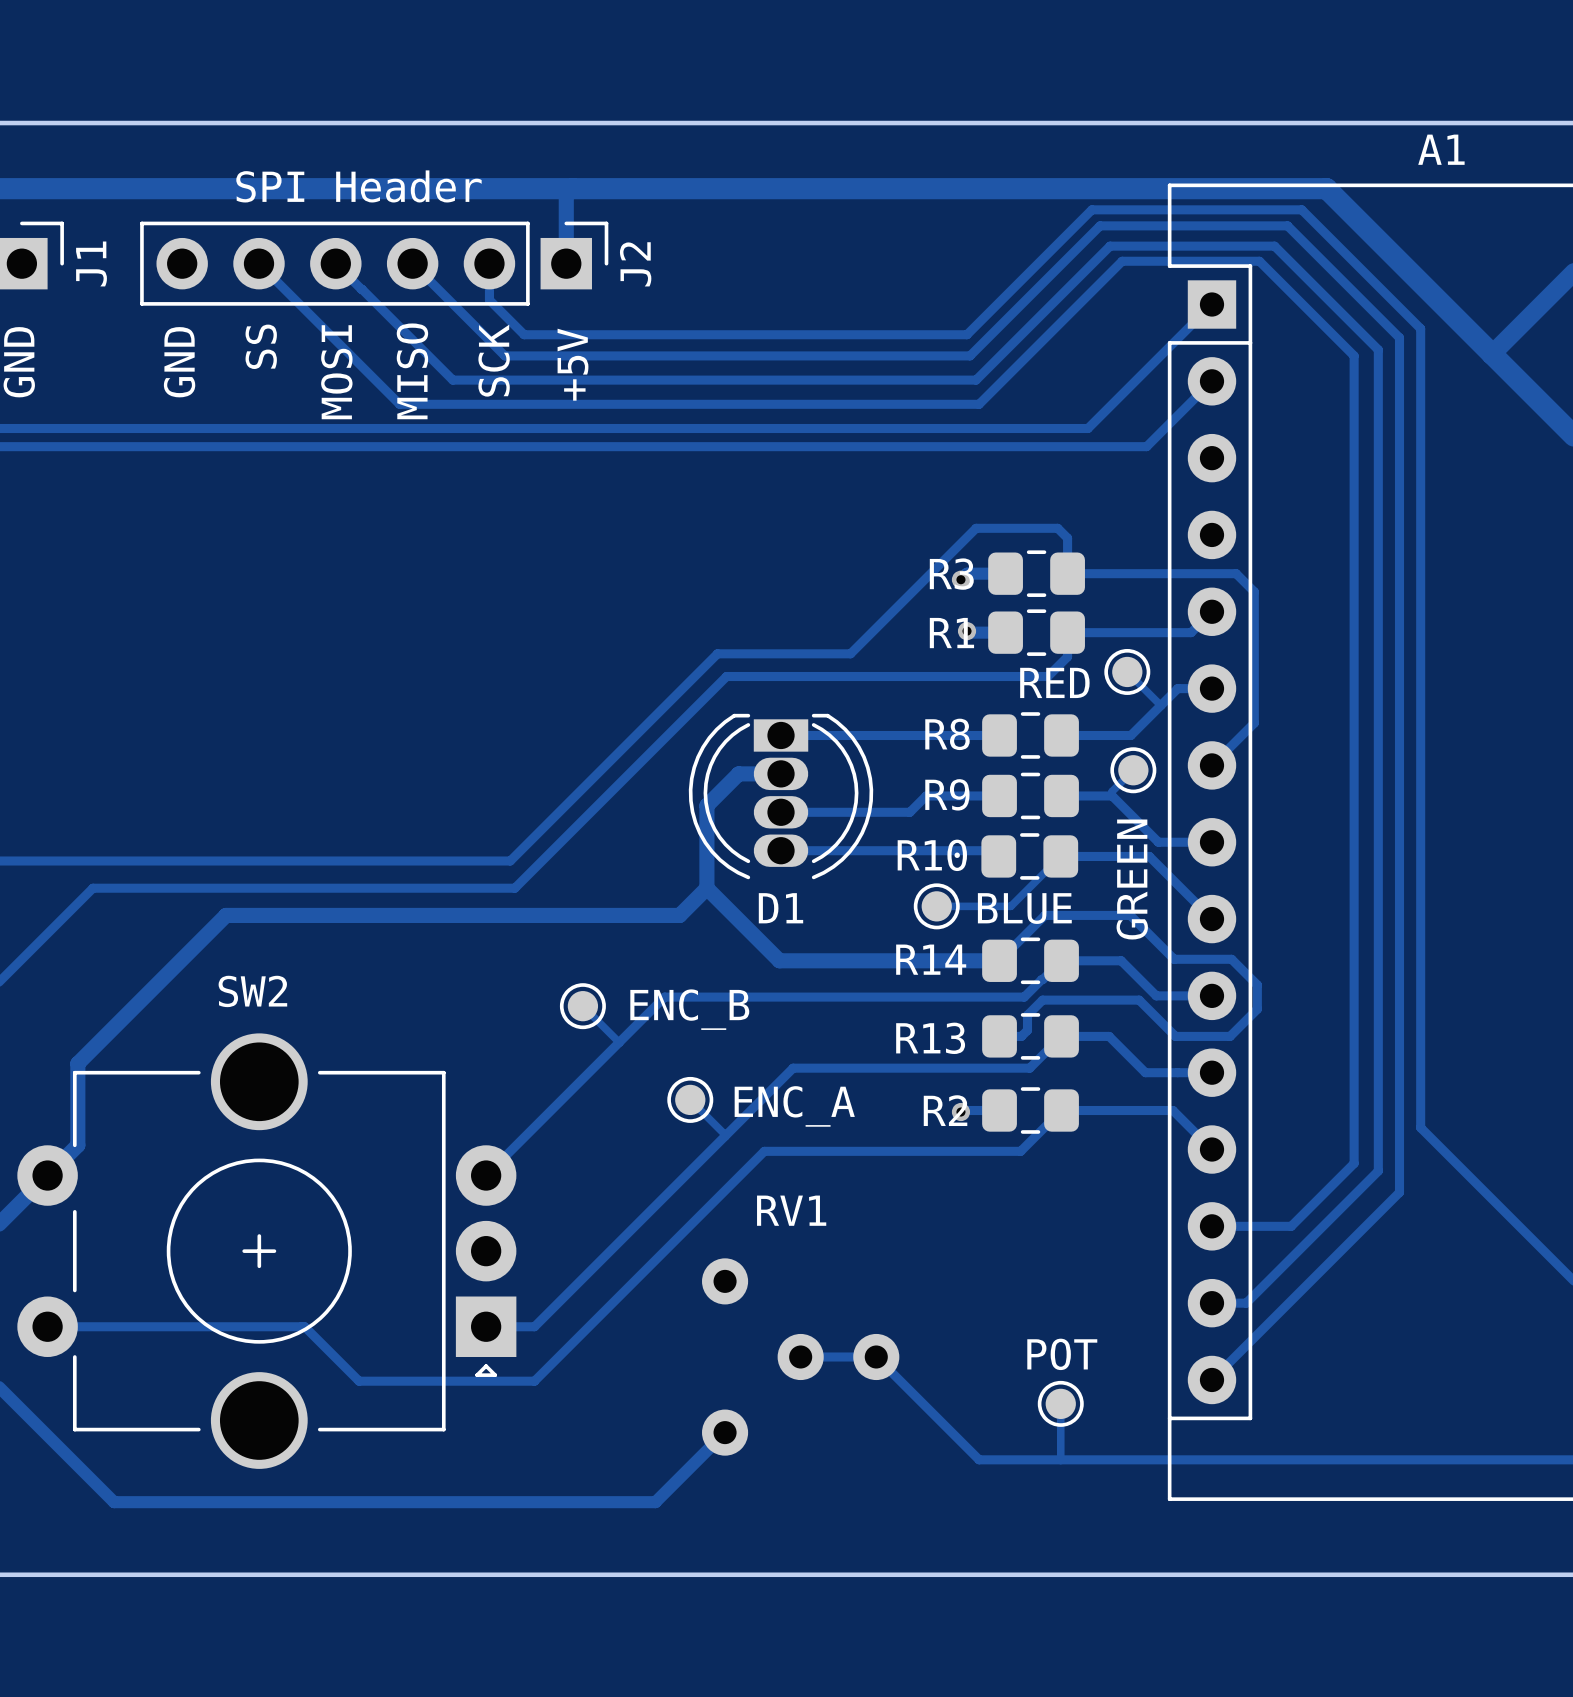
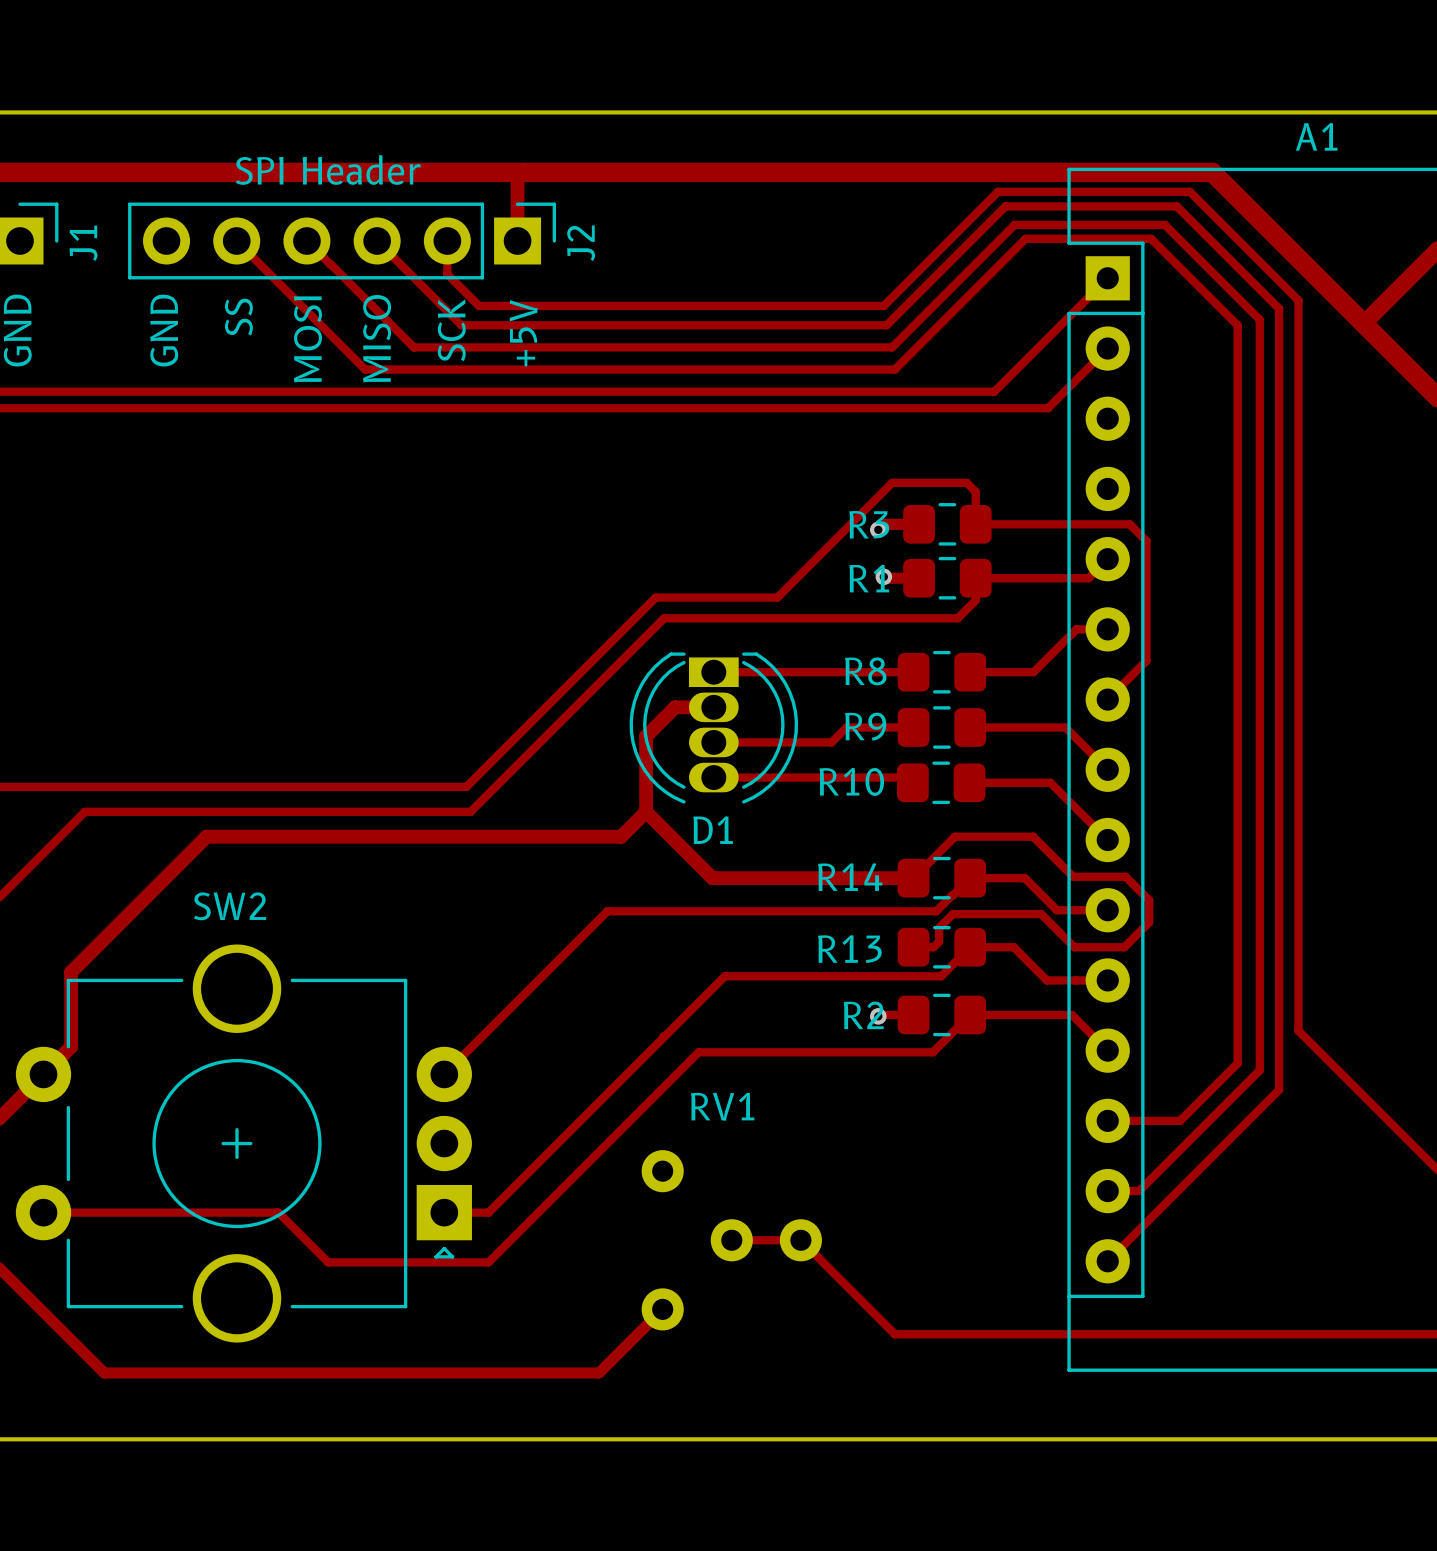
track: (1127, 671) (1160, 705) -> none
part: RED (1127, 671) -> none
track: (1133, 770) (1112, 791) (1112, 795) (1158, 842) (1211, 842) -> (1016, 727) (1065, 727) (1107, 769)
part: GREEN (1133, 770) -> none
track: (1060, 856) (1010, 906) (936, 906) -> none
part: BLUE (936, 906) -> none
track: (582, 1006) (619, 1042) -> none
part: ENC_B (582, 1006) -> none
track: (690, 1099) (725, 1134) -> none
part: ENC_A (690, 1099) -> none
track: (1060, 1403) (1060, 1459) -> none
part: POT (1060, 1403) -> none

